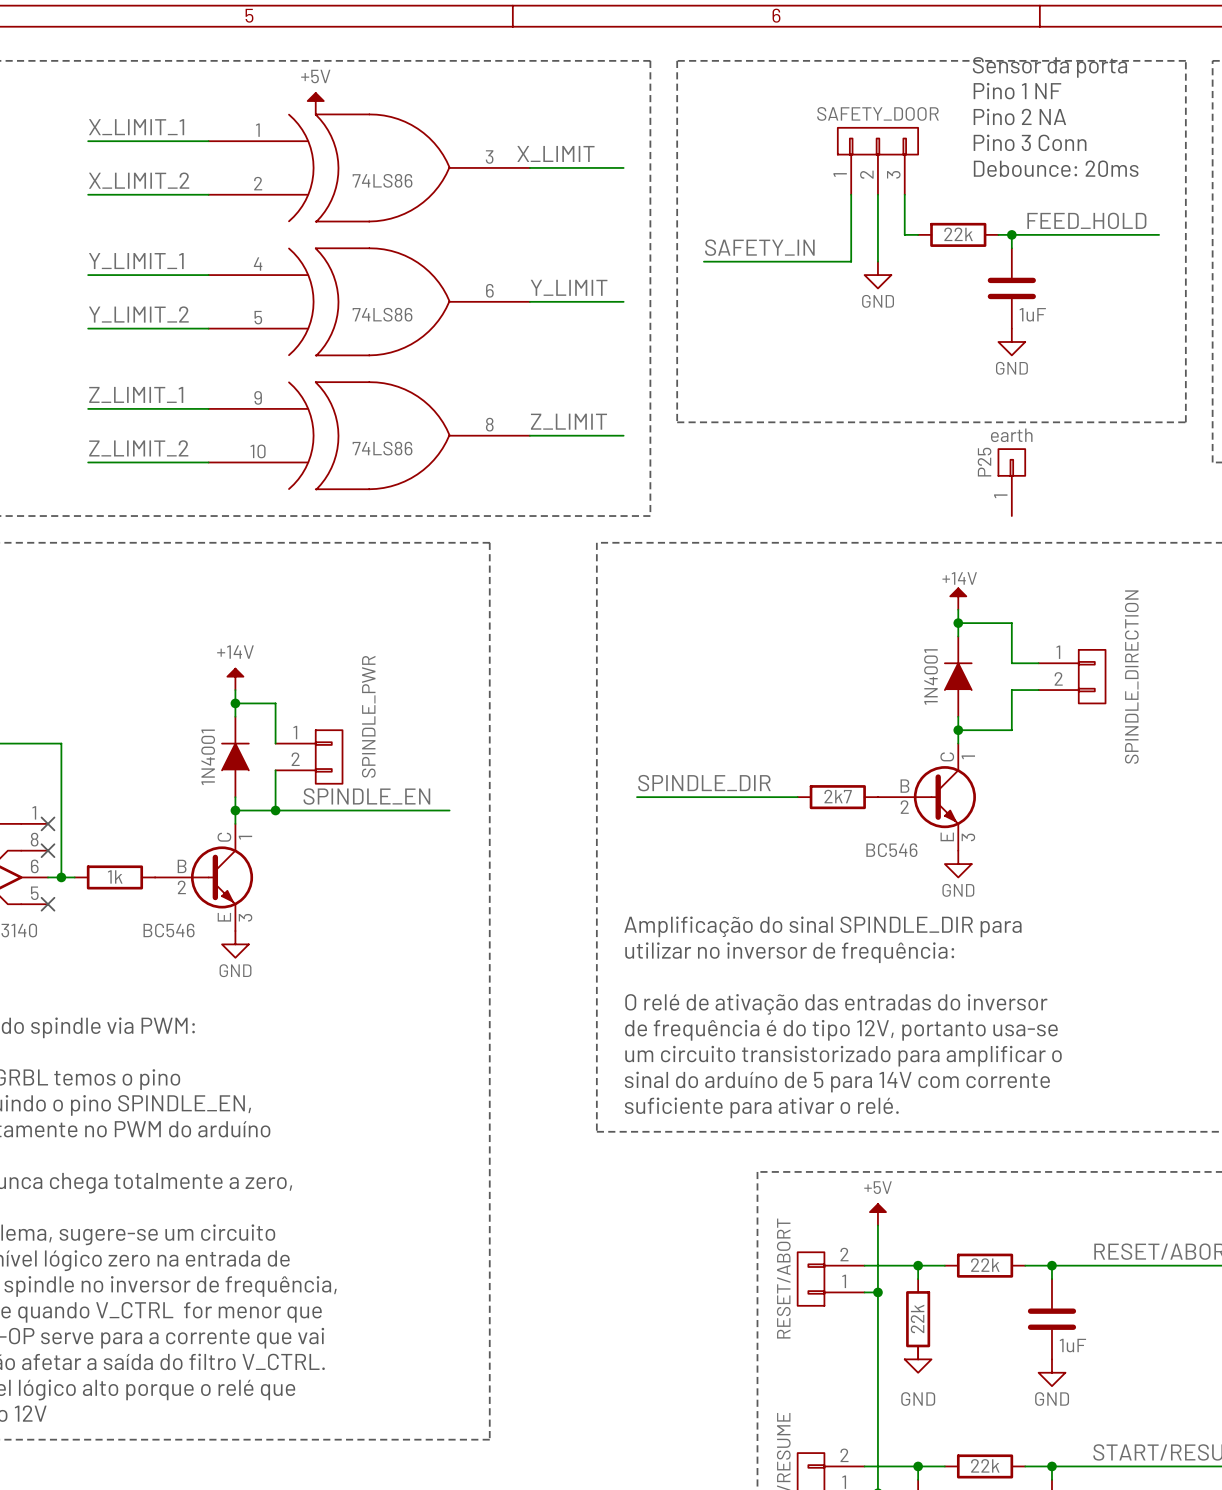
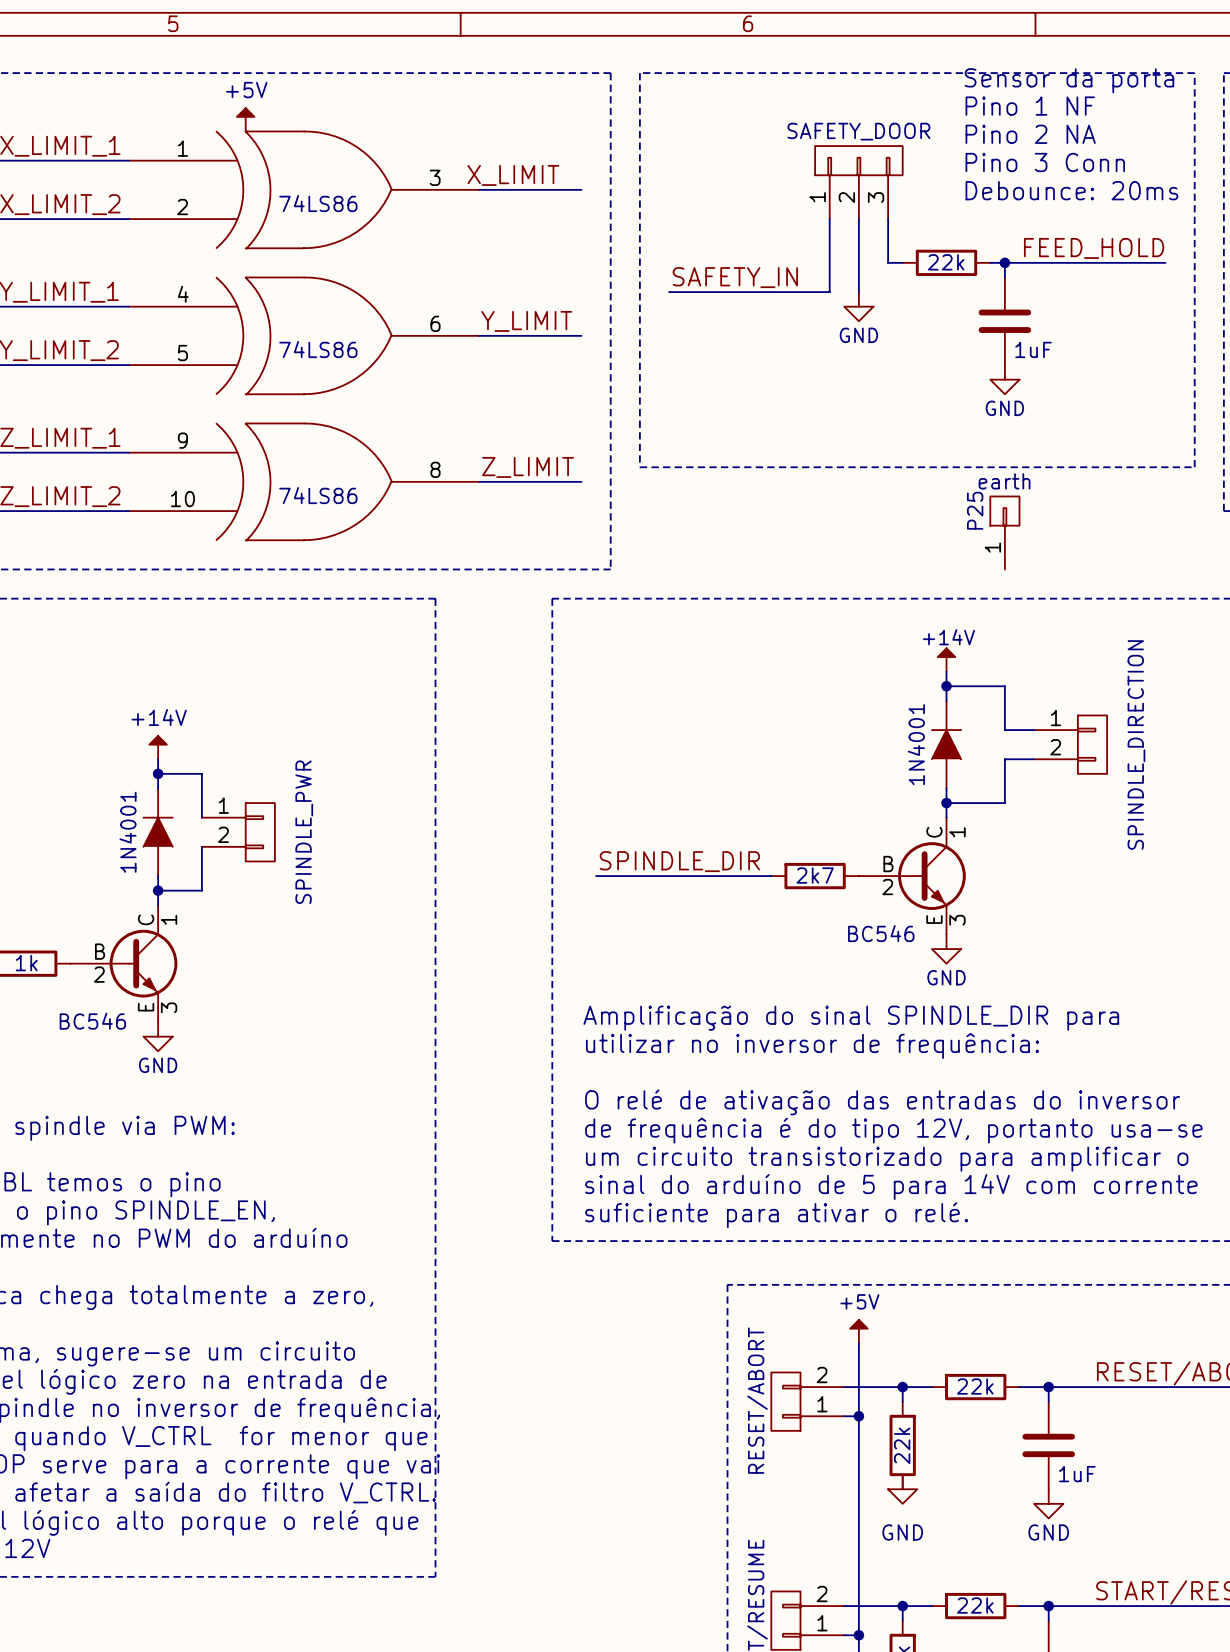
part value position: SPINDLE_PWR (368, 716) -> SPINDLE_PWR (304, 832)
label: SPINDLE_EN (366, 796) -> none
wire: (275, 810) (449, 810) -> none
junction: (275, 810) -> none

